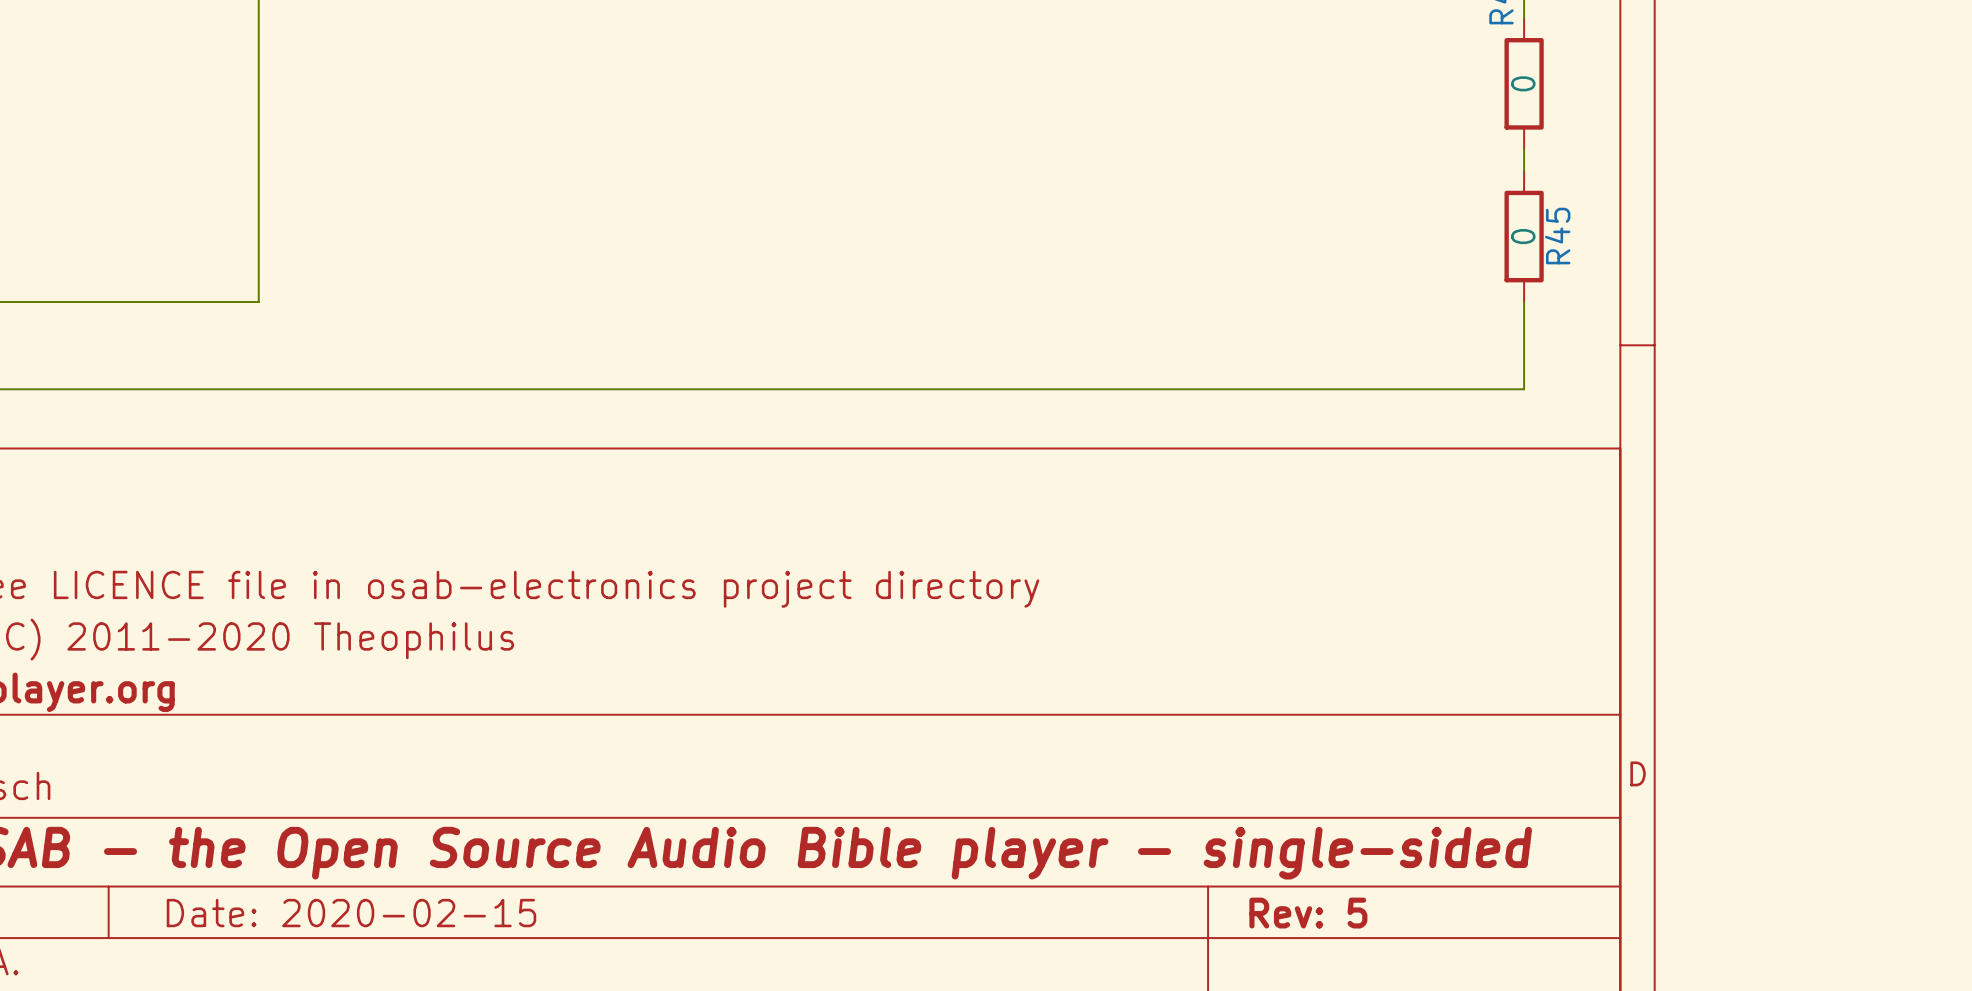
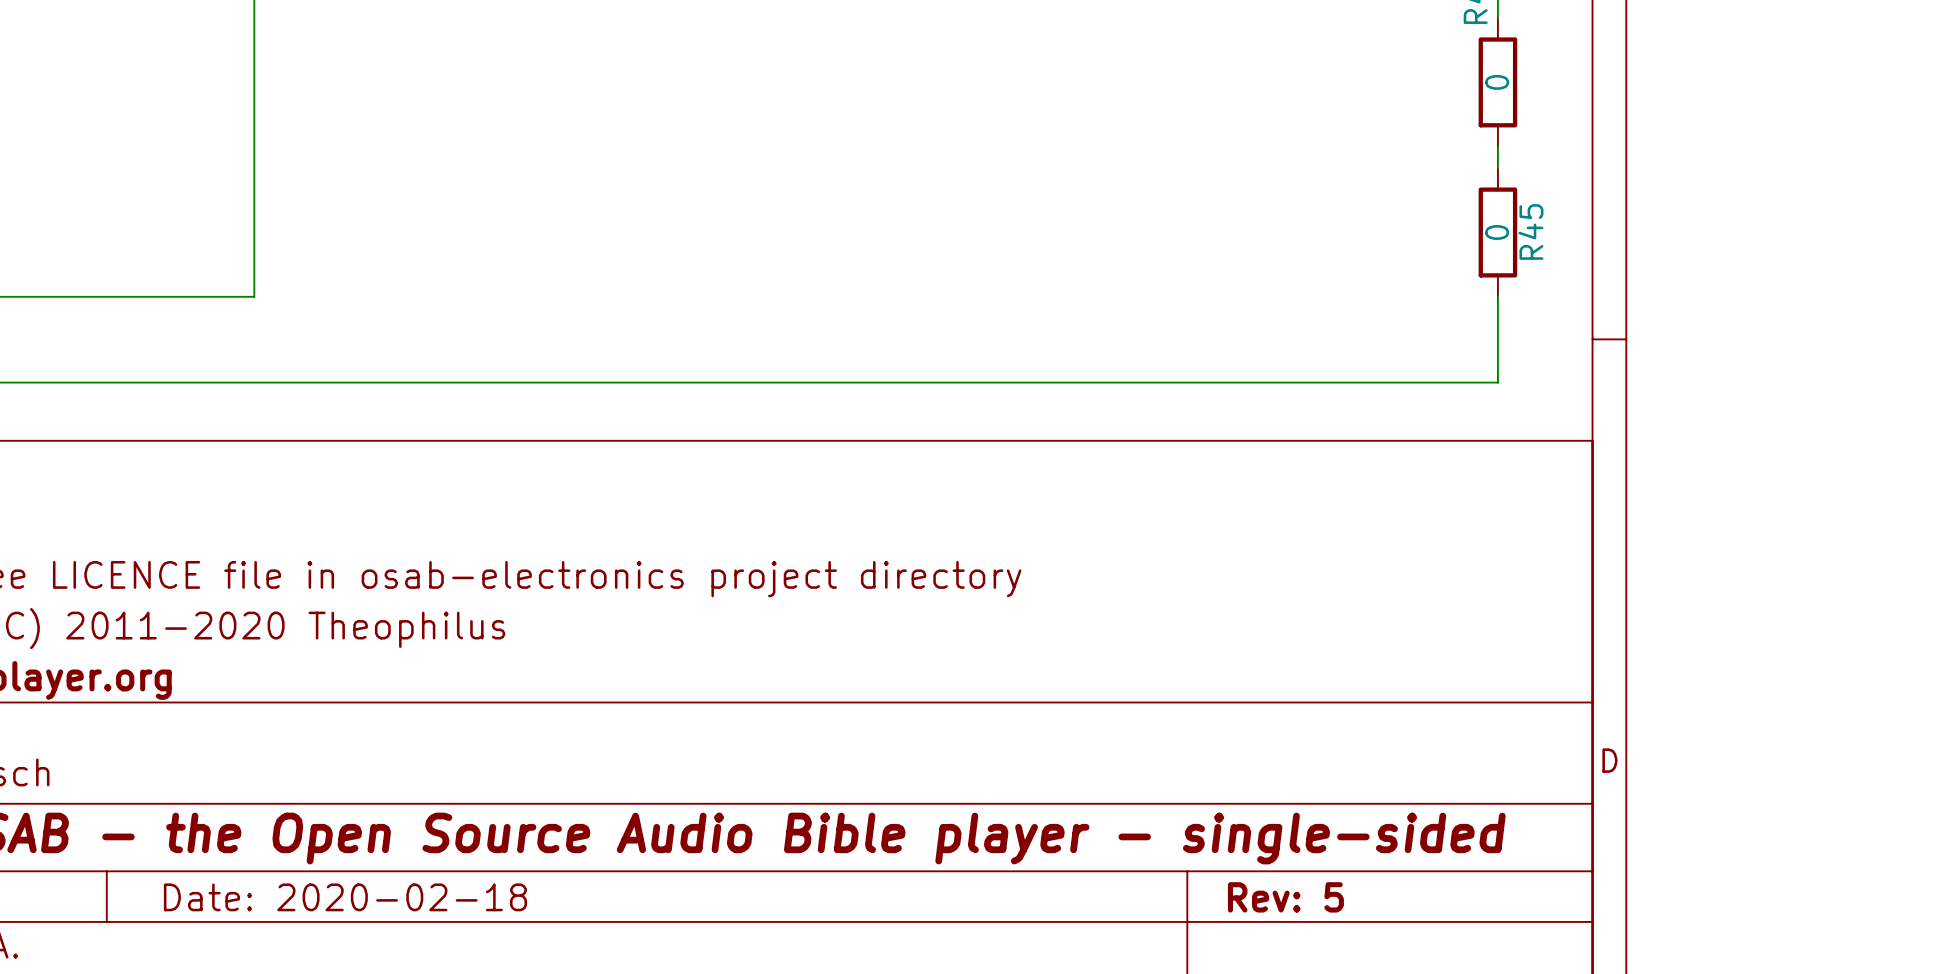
title block: Date: 2020-02-15 (351, 913) -> Date: 2020-02-18 (345, 897)

